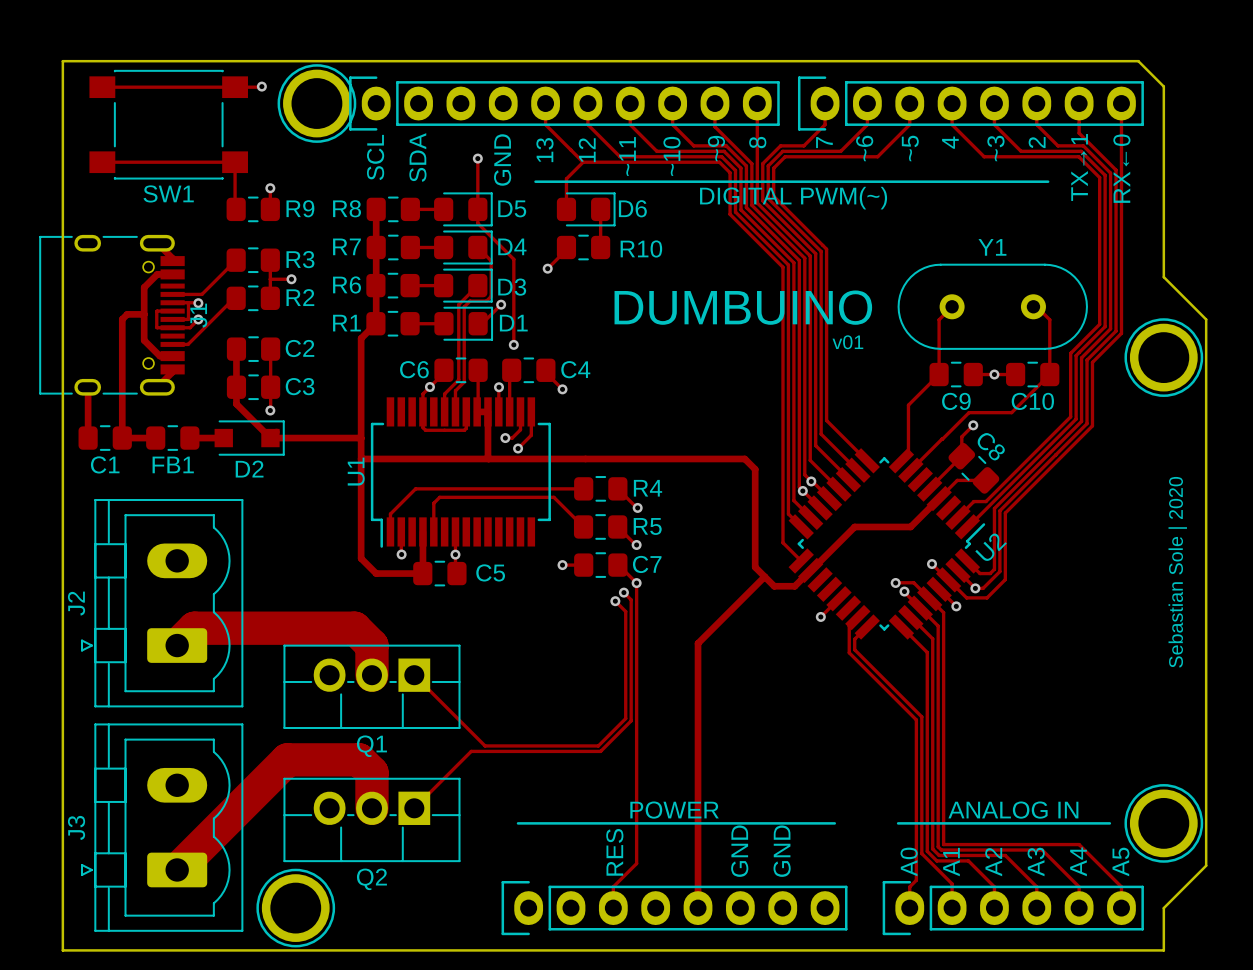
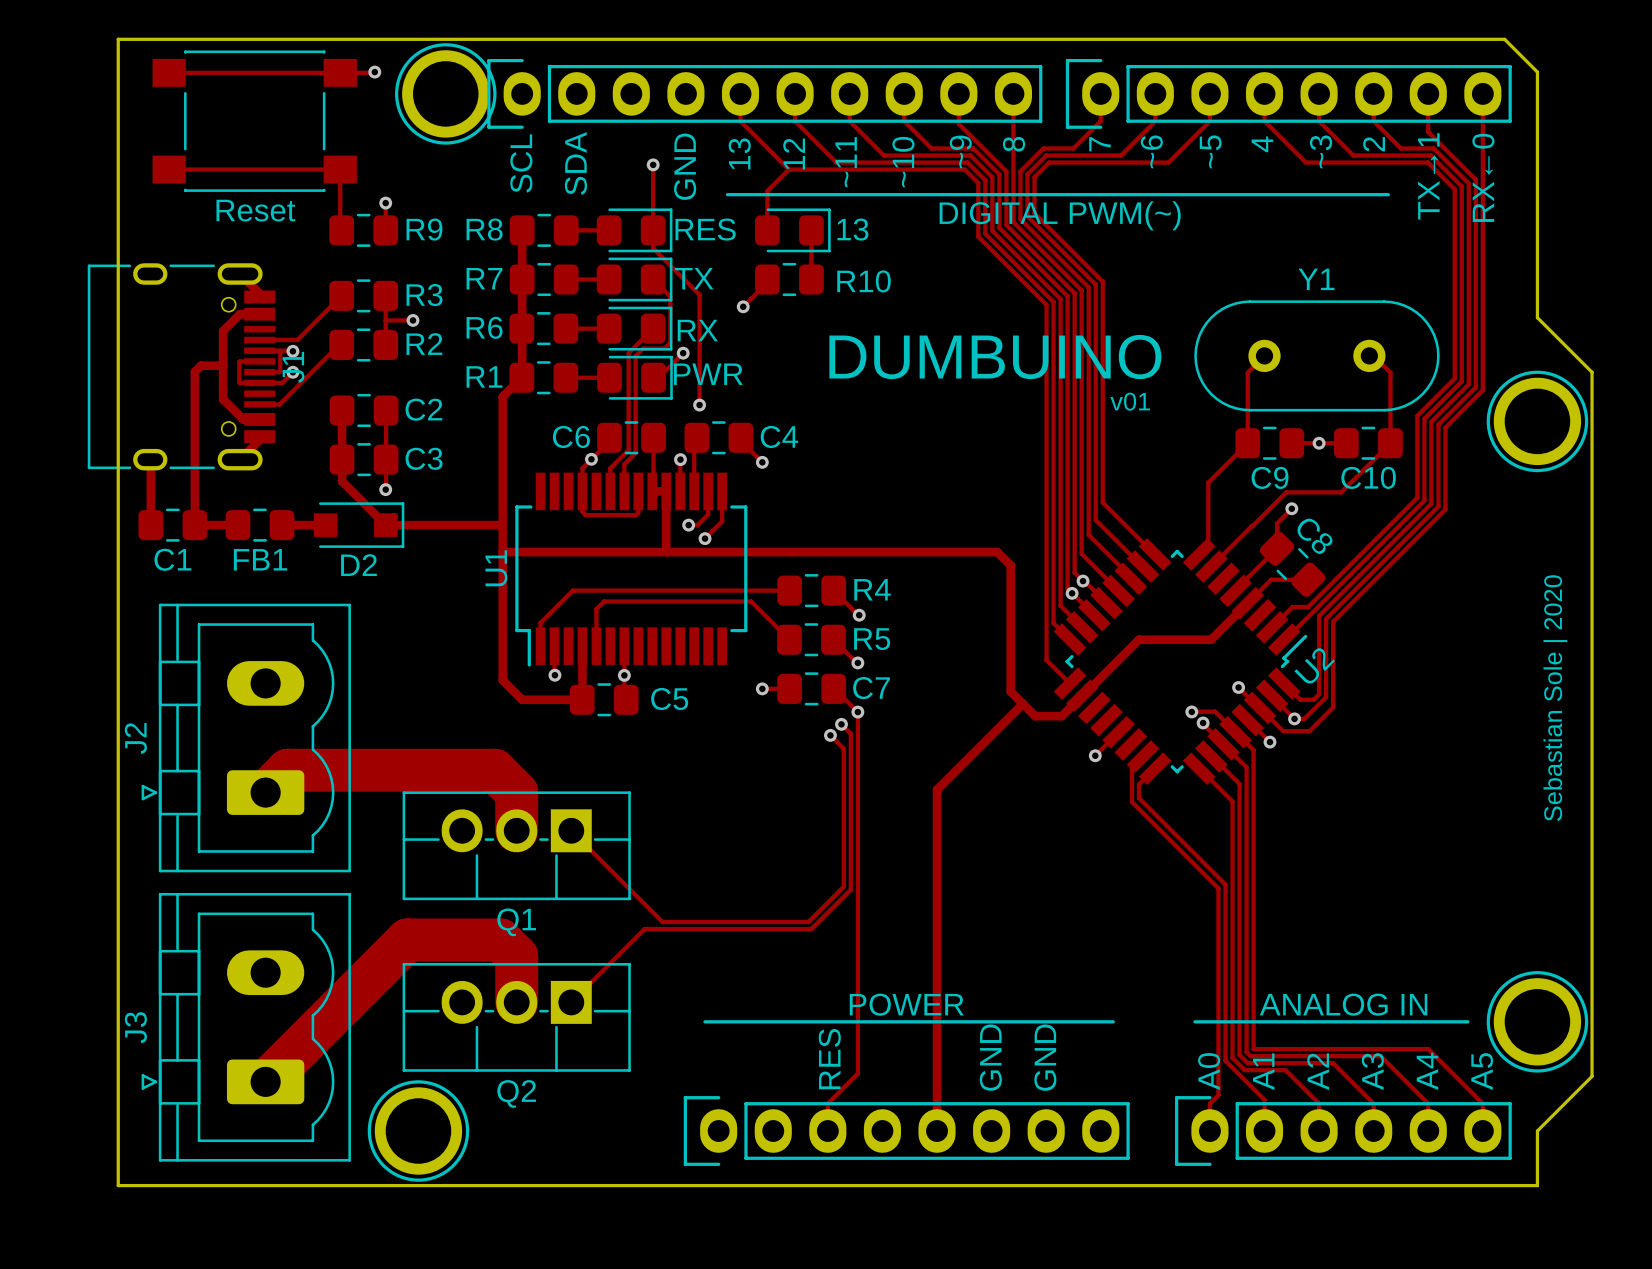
SW1 name: SW1 (168, 193) -> Reset (255, 210)
D5 name: D5 (512, 208) -> RES (705, 229)
D6 name: D6 (632, 208) -> 13 (852, 229)
D4 name: D4 (512, 246) -> TX (694, 278)
D3 name: D3 (512, 287) -> RX (697, 330)
D1 name: D1 (513, 323) -> PWR (708, 374)

